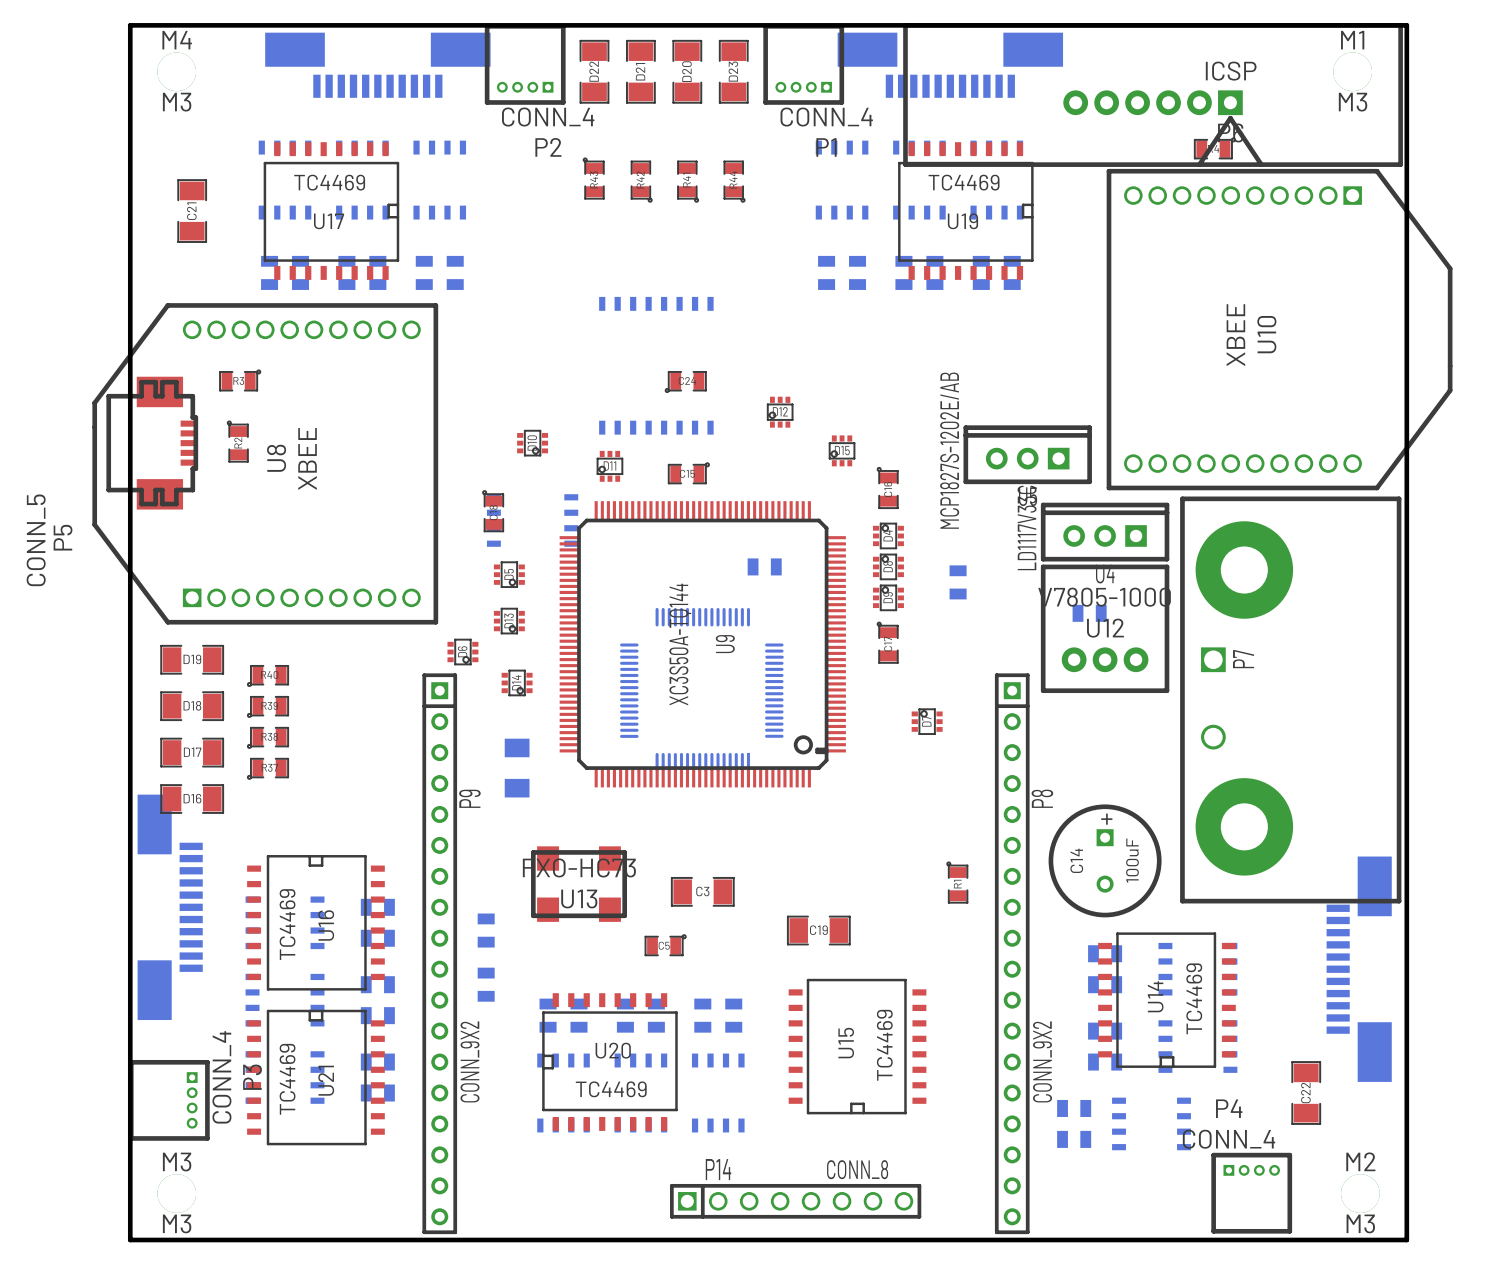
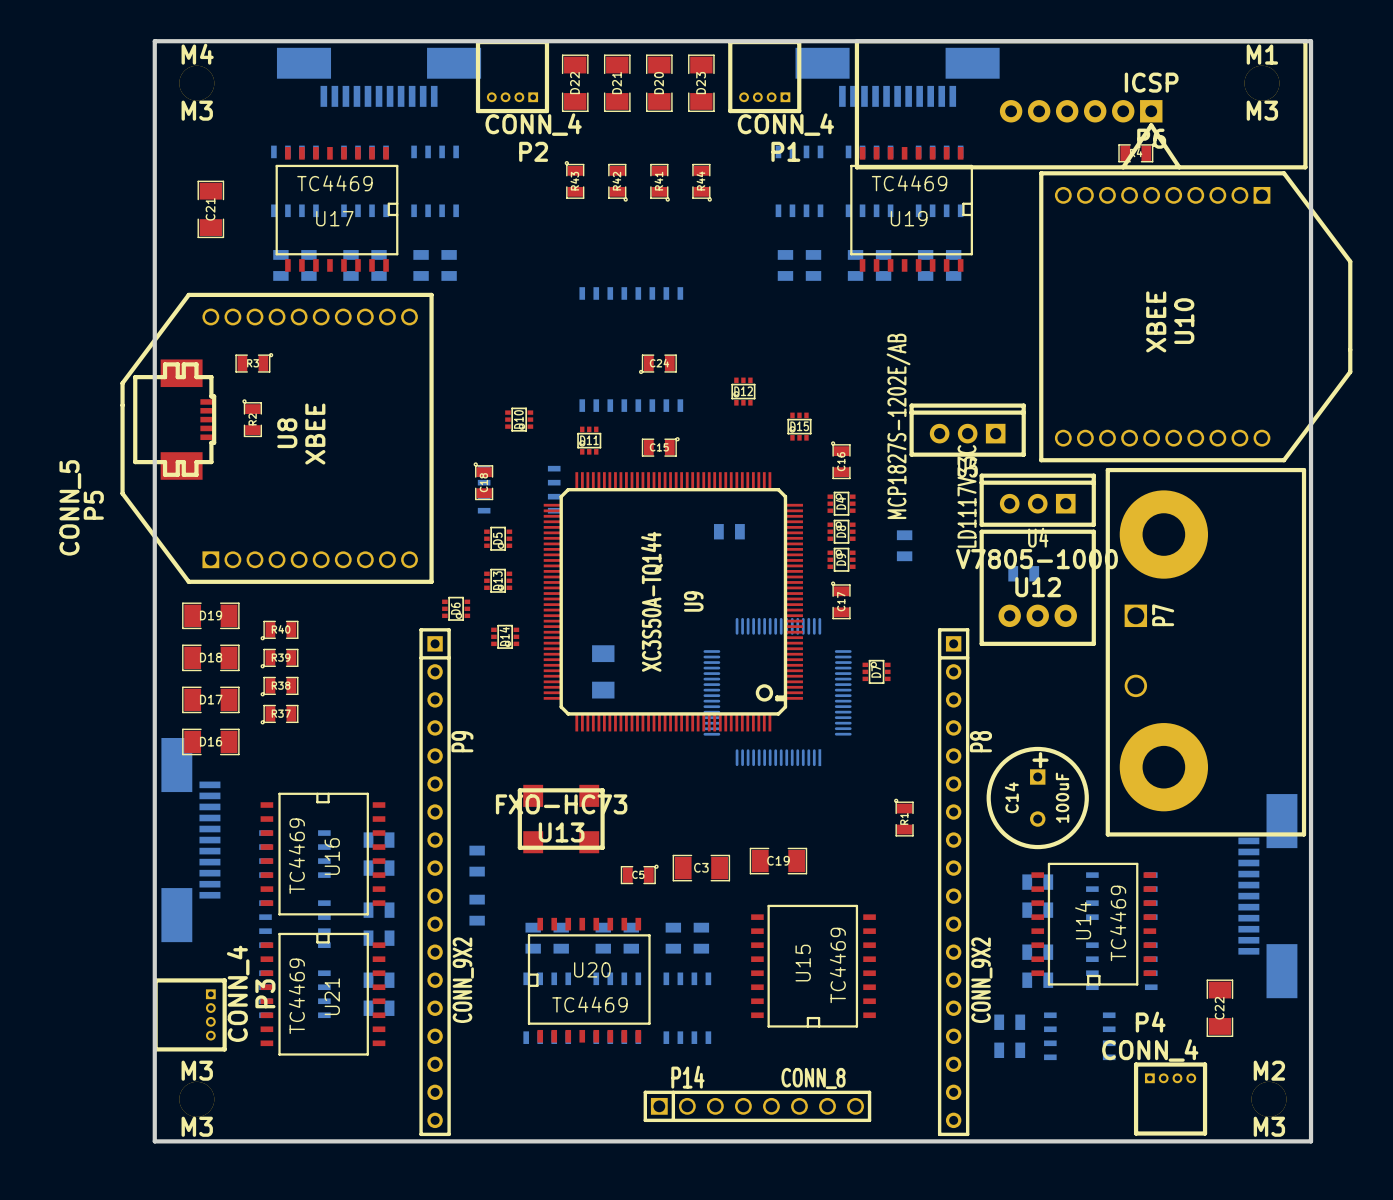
part position: (701, 689) -> (777, 692)
part position: (517, 768) -> (603, 671)
C3 position: (702, 891) -> (701, 868)

